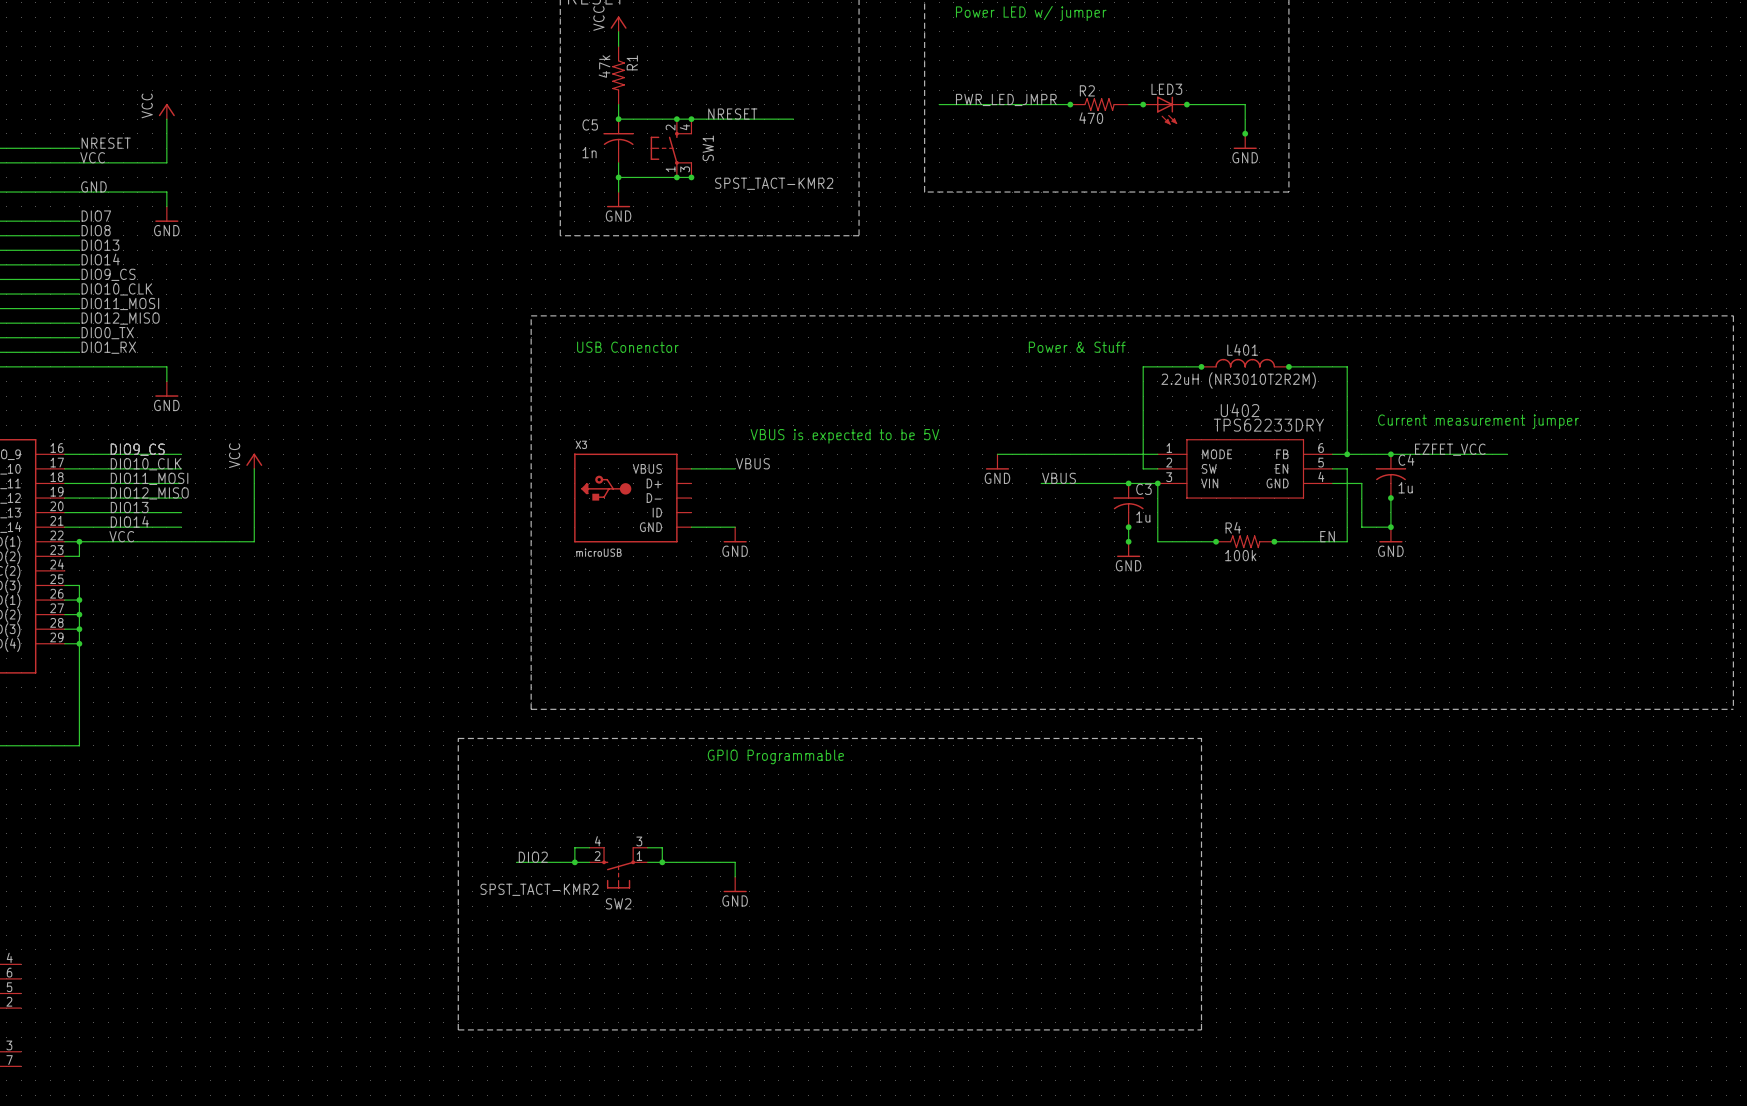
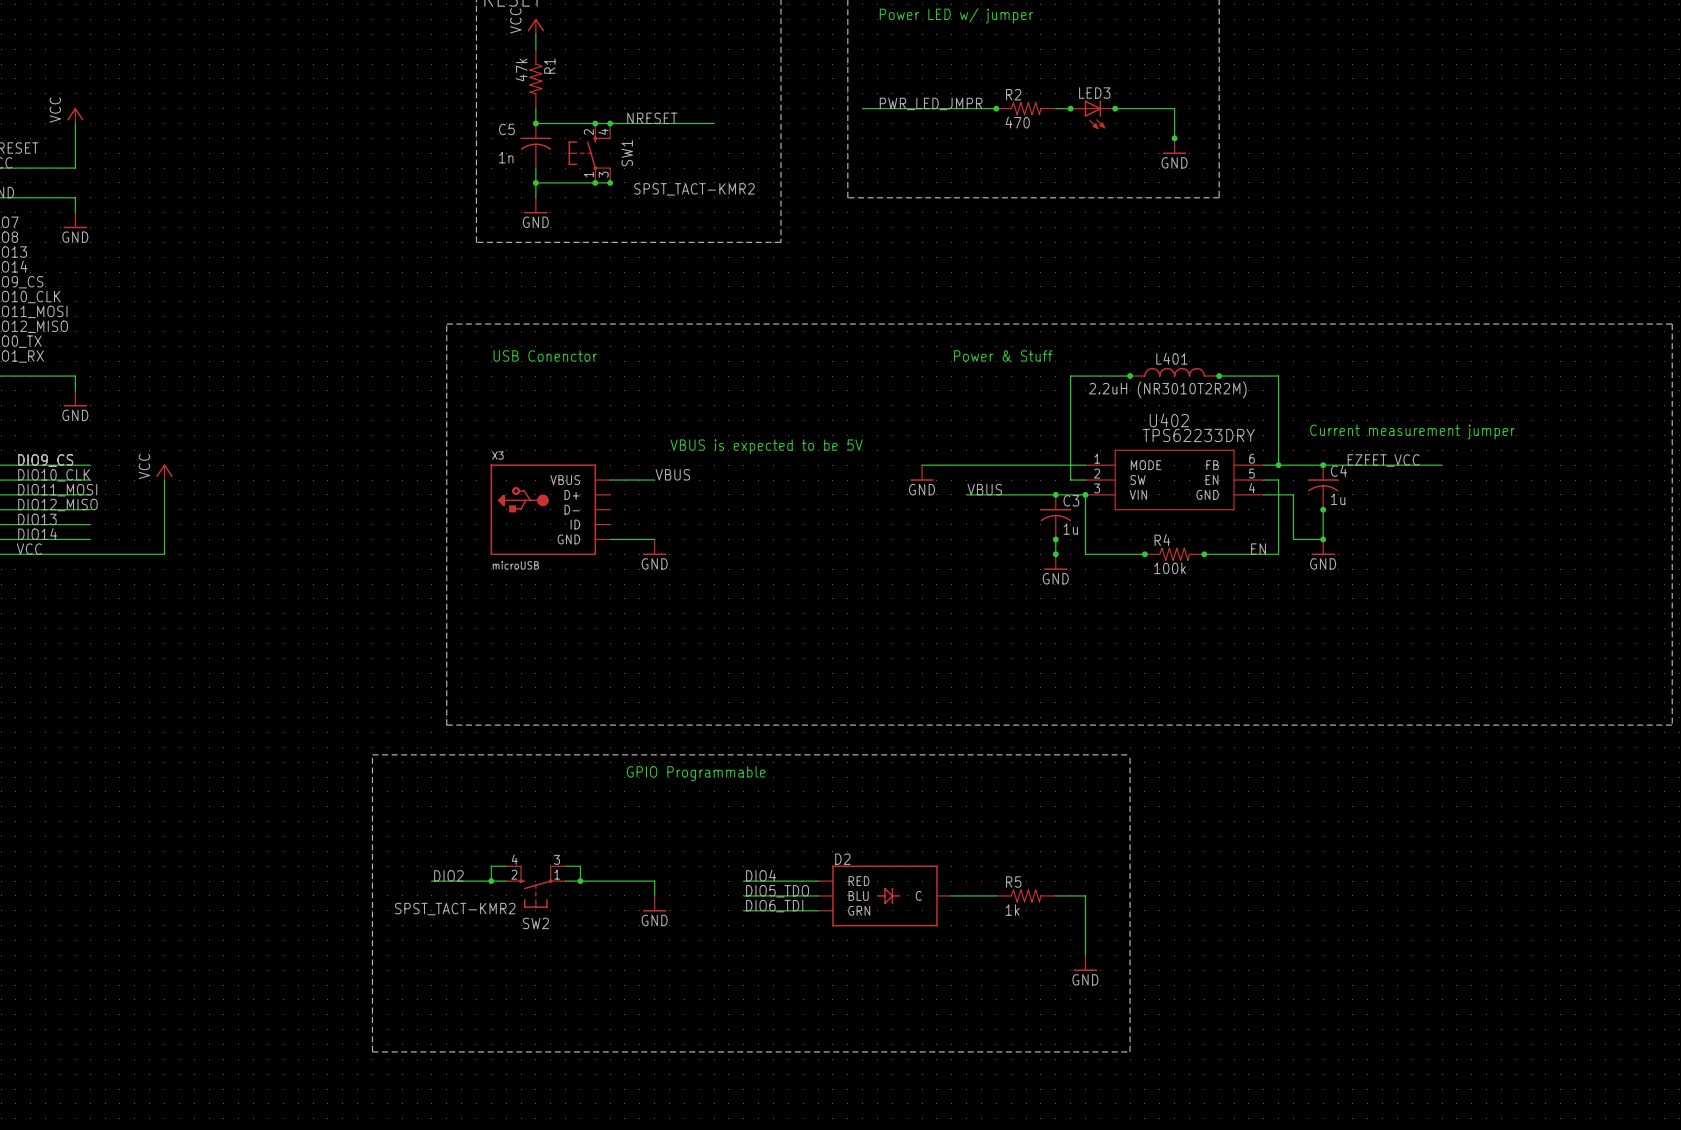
label: none -> DIO4 (761, 875)
wire: none -> (743, 881) (818, 881)
label: none -> DIO5_TDO (777, 891)
wire: none -> (743, 895) (818, 895)
D2: none -> (884, 895)
wire: none -> (951, 895) (996, 895)
R5: none -> 1k (1026, 895)
wire: none -> (1055, 895) (1085, 895) (1085, 955)
label: none -> DIO6_TDI (774, 906)
wire: none -> (743, 910) (818, 910)
power symbol: none -> GND (1085, 963)

